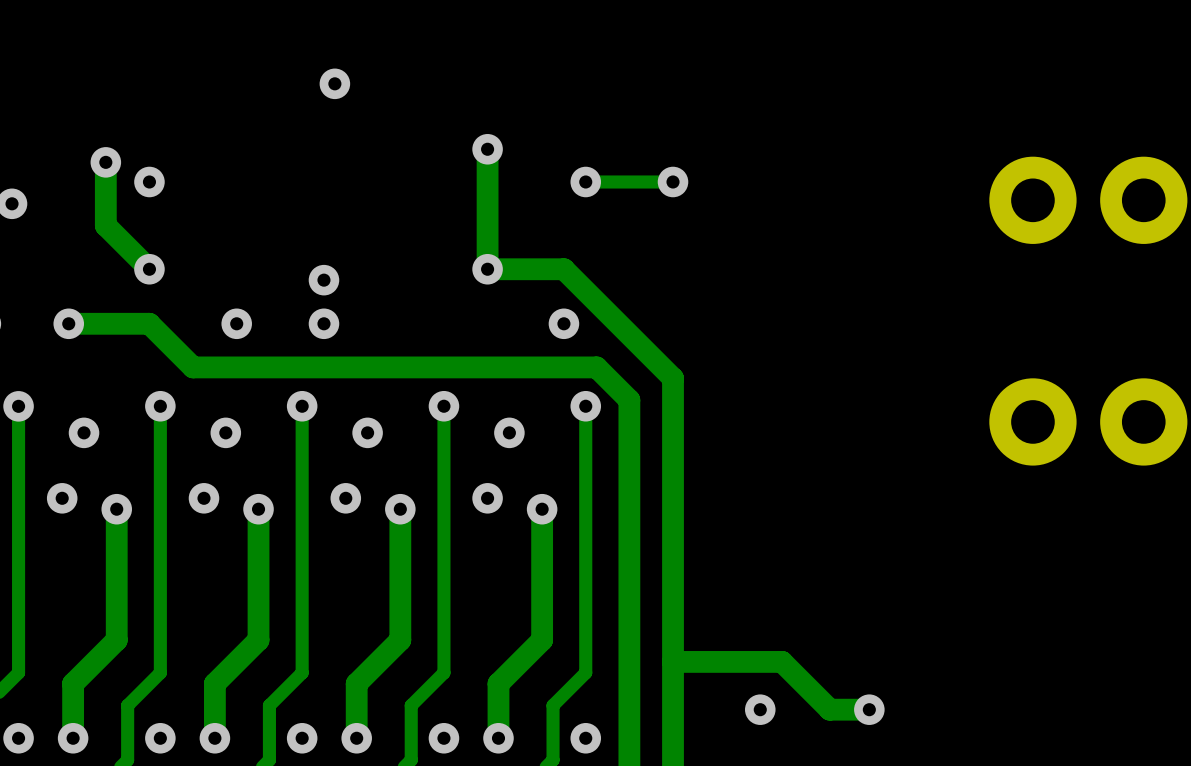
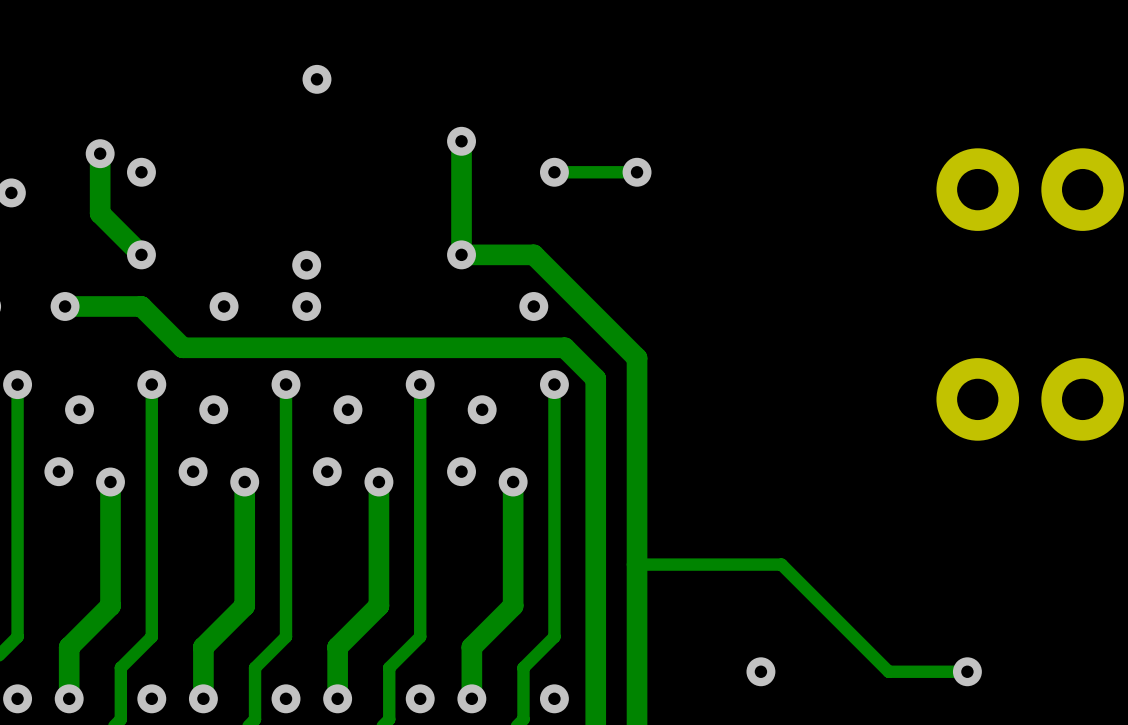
track: none -> (637, 564) (781, 564) (888, 671) (967, 671)
track: (673, 661) (782, 661) (829, 709) (869, 709) -> none
via: (760, 709) -> none
via: none -> (760, 671)
via: (869, 709) -> none
via: none -> (967, 671)

